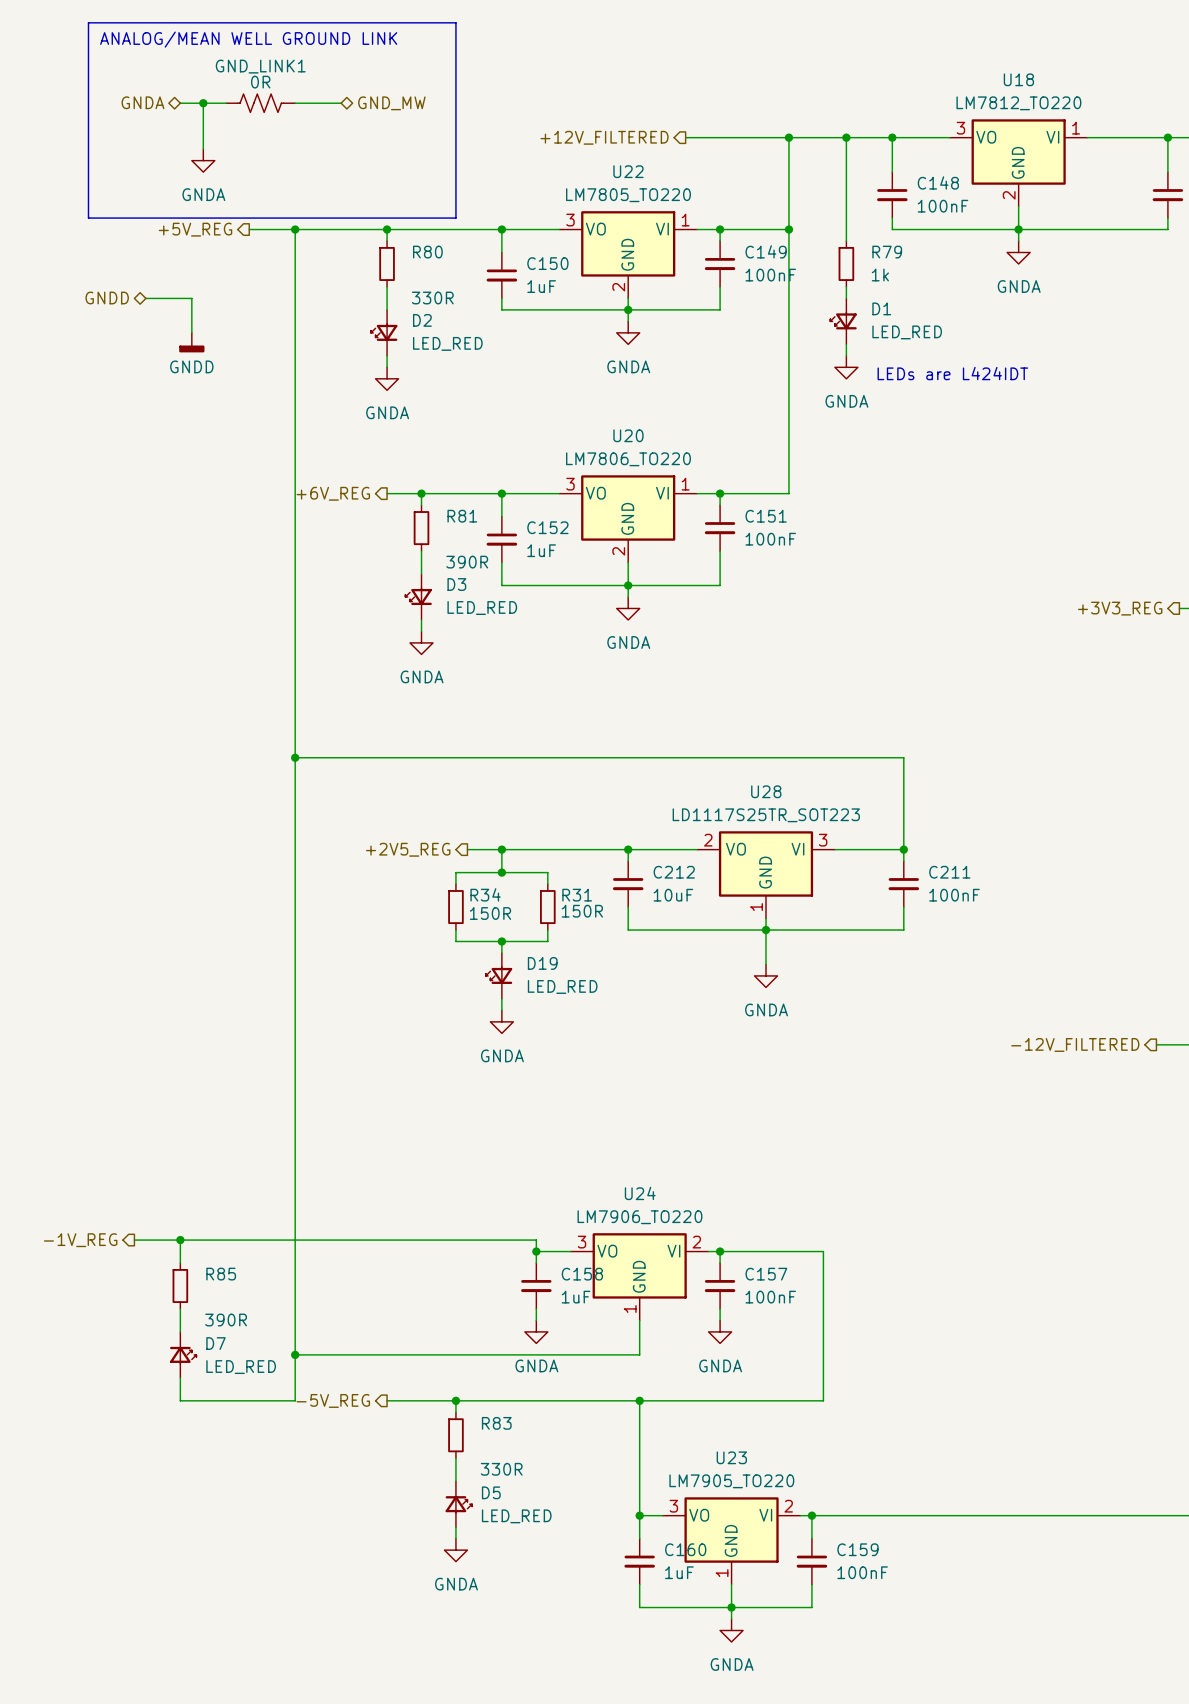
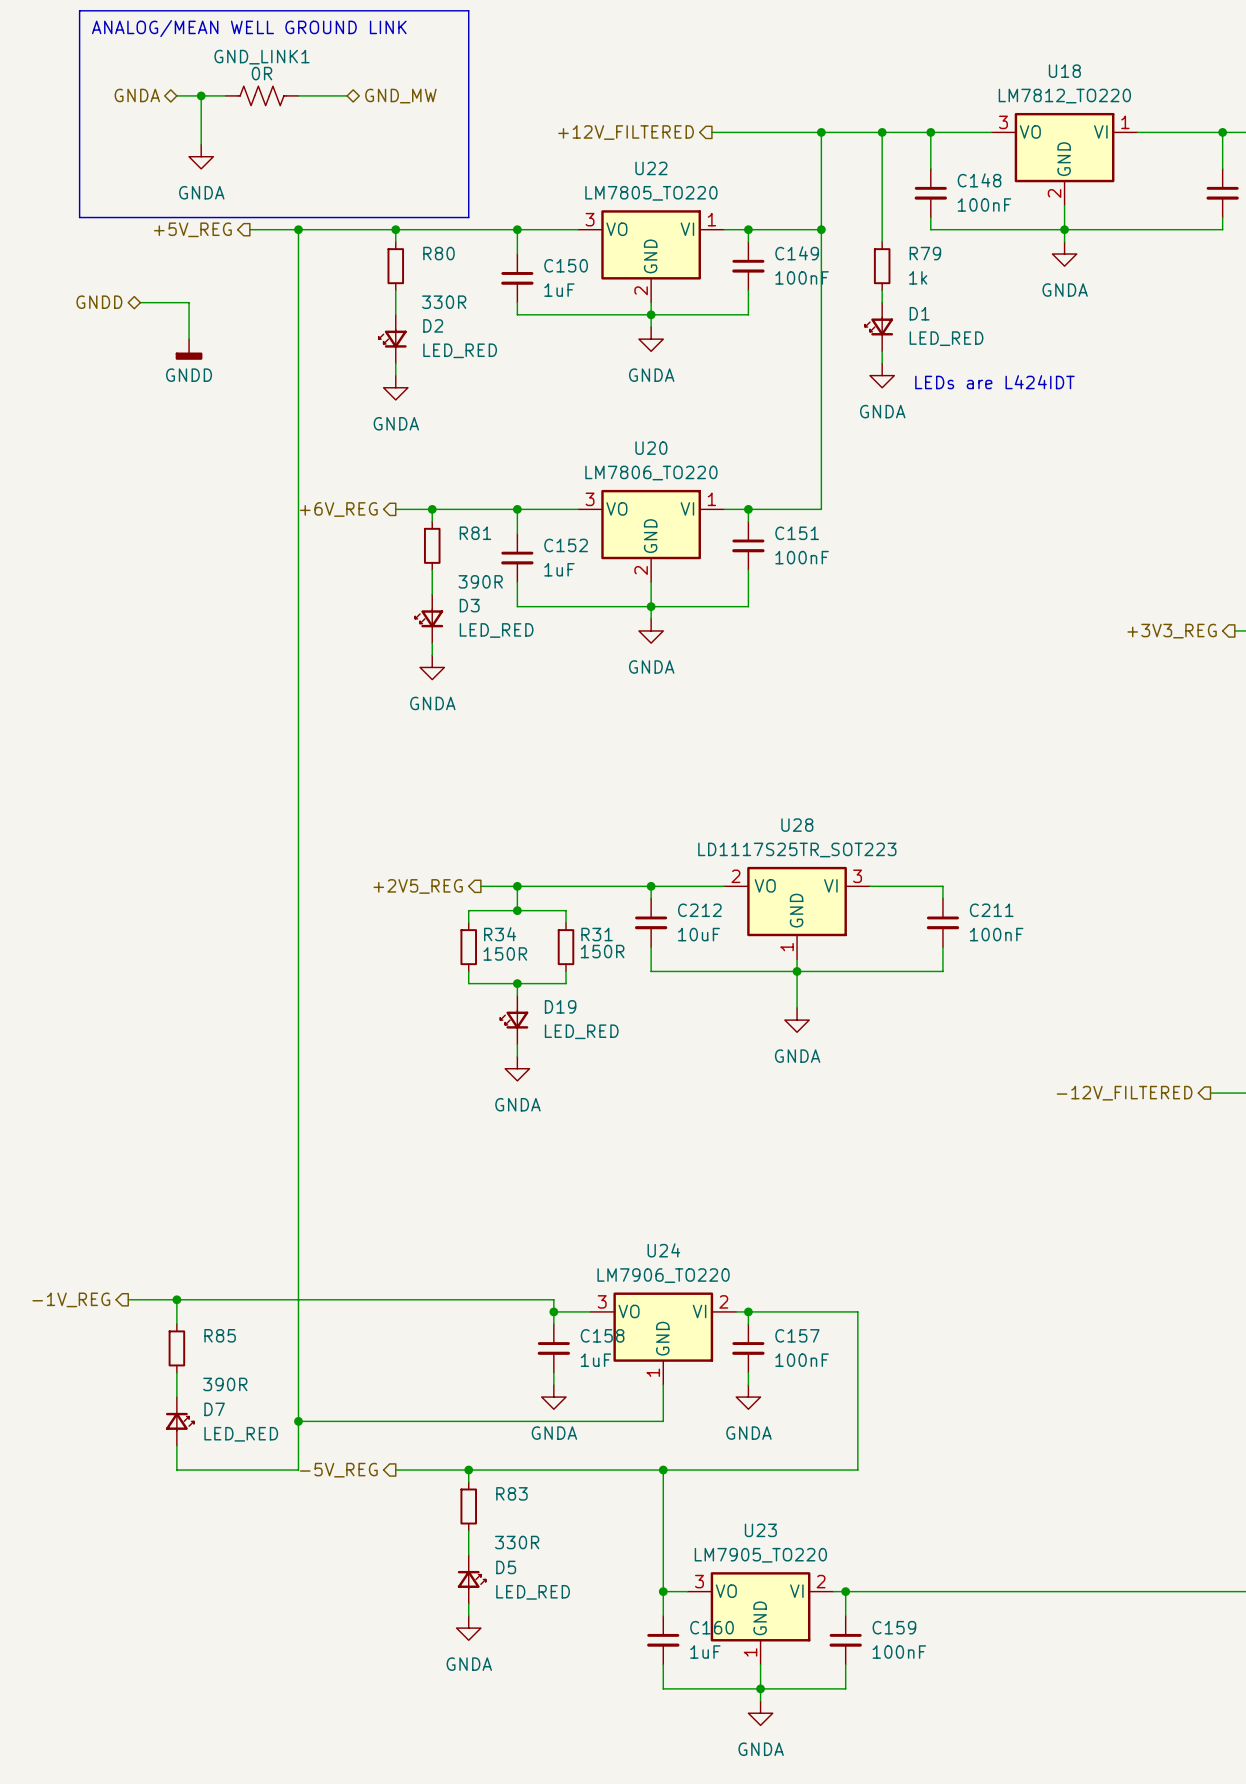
wire: (295, 757) (903, 757) (903, 849) -> none
junction: (295, 757) -> none
junction: (903, 849) -> none

